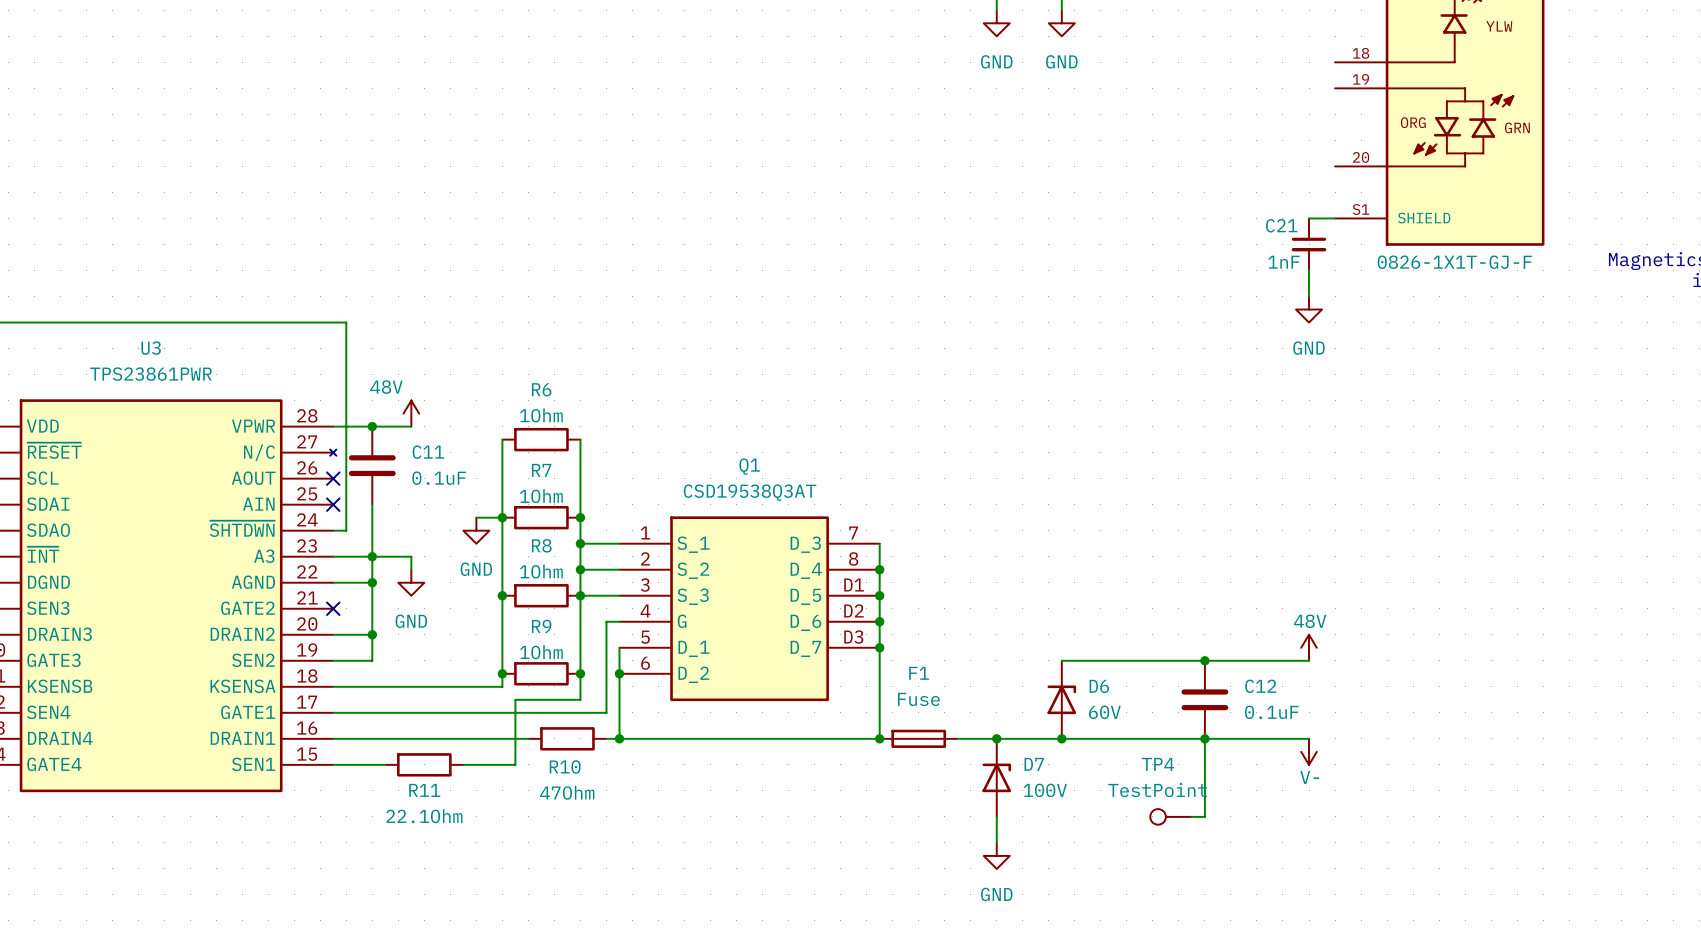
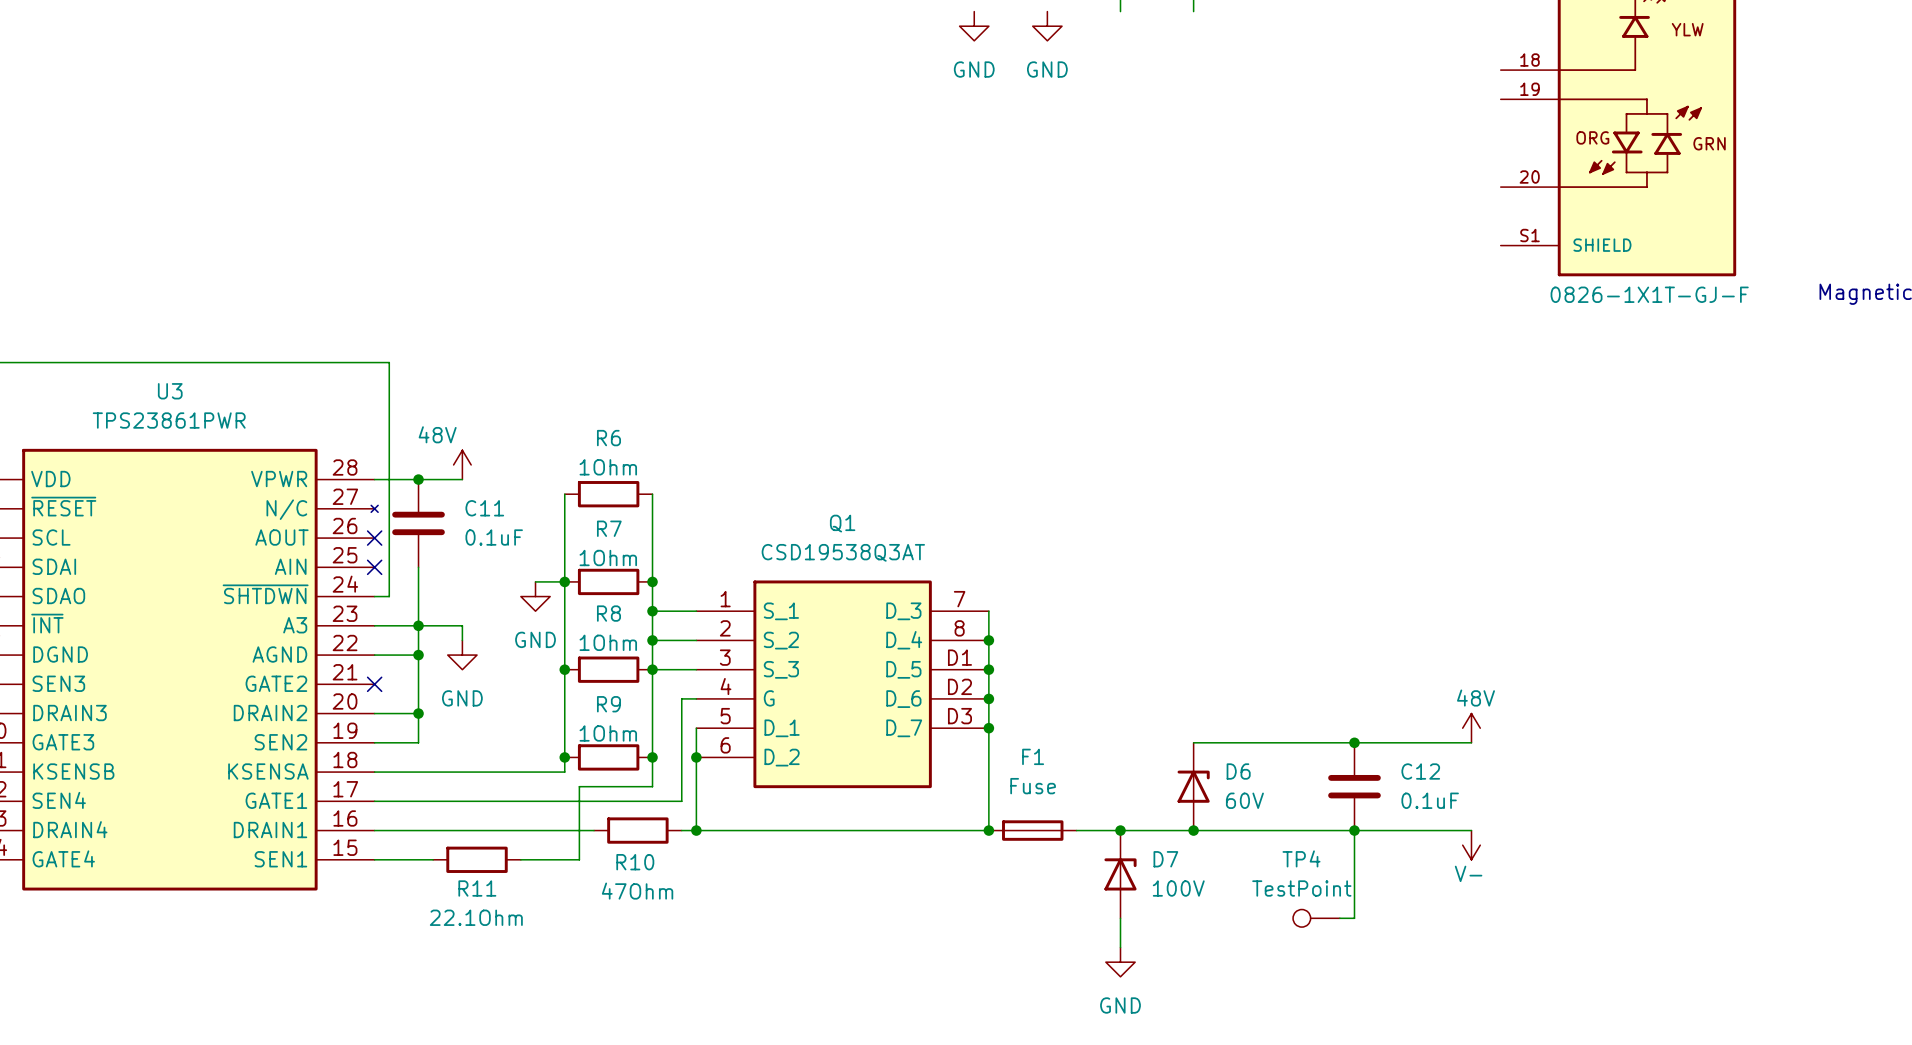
power symbol: none -> GND (974, 26)
power symbol: none -> GND (1047, 26)
power symbol: GND (996, 23) -> none
power symbol: GND (1061, 23) -> none
wire: (1309, 218) (1335, 218) -> none
C21: 1nF (1309, 244) -> none
wire: (1309, 270) (1309, 296) -> none
power symbol: GND (1309, 309) -> none

